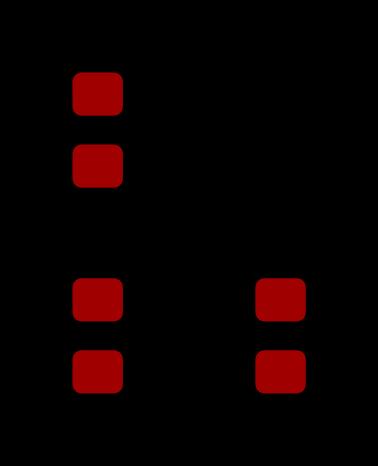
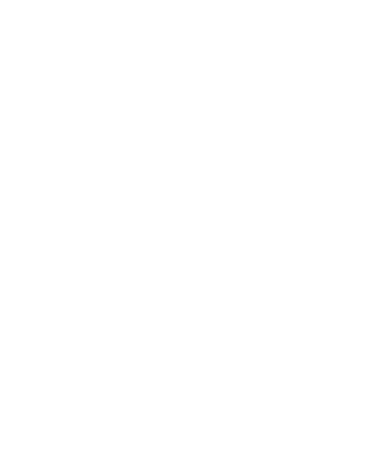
part: (97, 130) -> none
part: (97, 335) -> none
part: (280, 335) -> none

